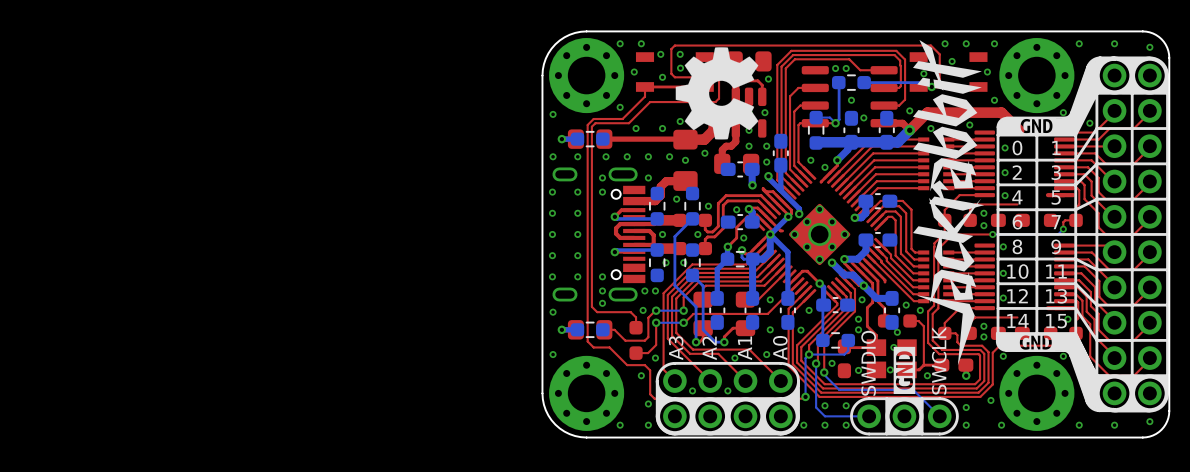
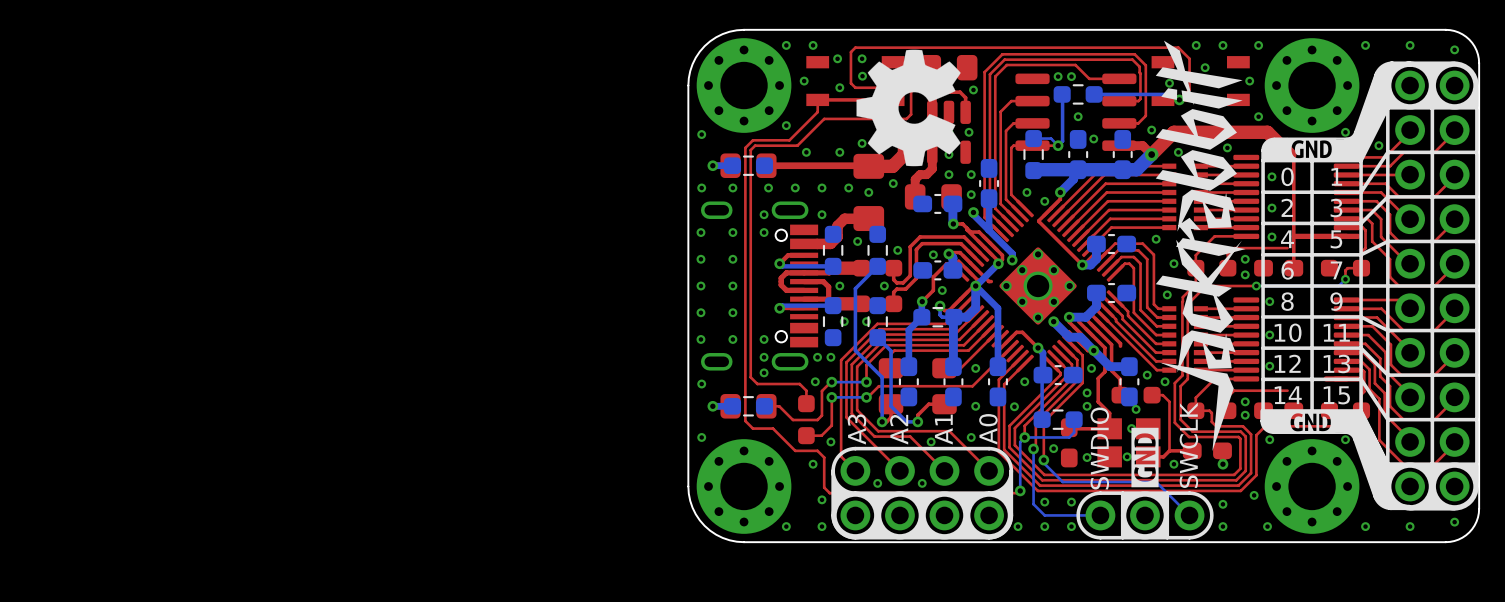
top track: none -> (1289, 154) (1293, 158) (1293, 268)
top track: none -> (1039, 219) (1038, 221) (1082, 264)
top track: none -> (953, 223) (962, 223) (966, 228)
top track: none -> (1326, 236) (1294, 236)
via: none -> (1156, 239)
via: none -> (1173, 263)
via: none -> (1167, 294)
via: (1067, 319) -> none

